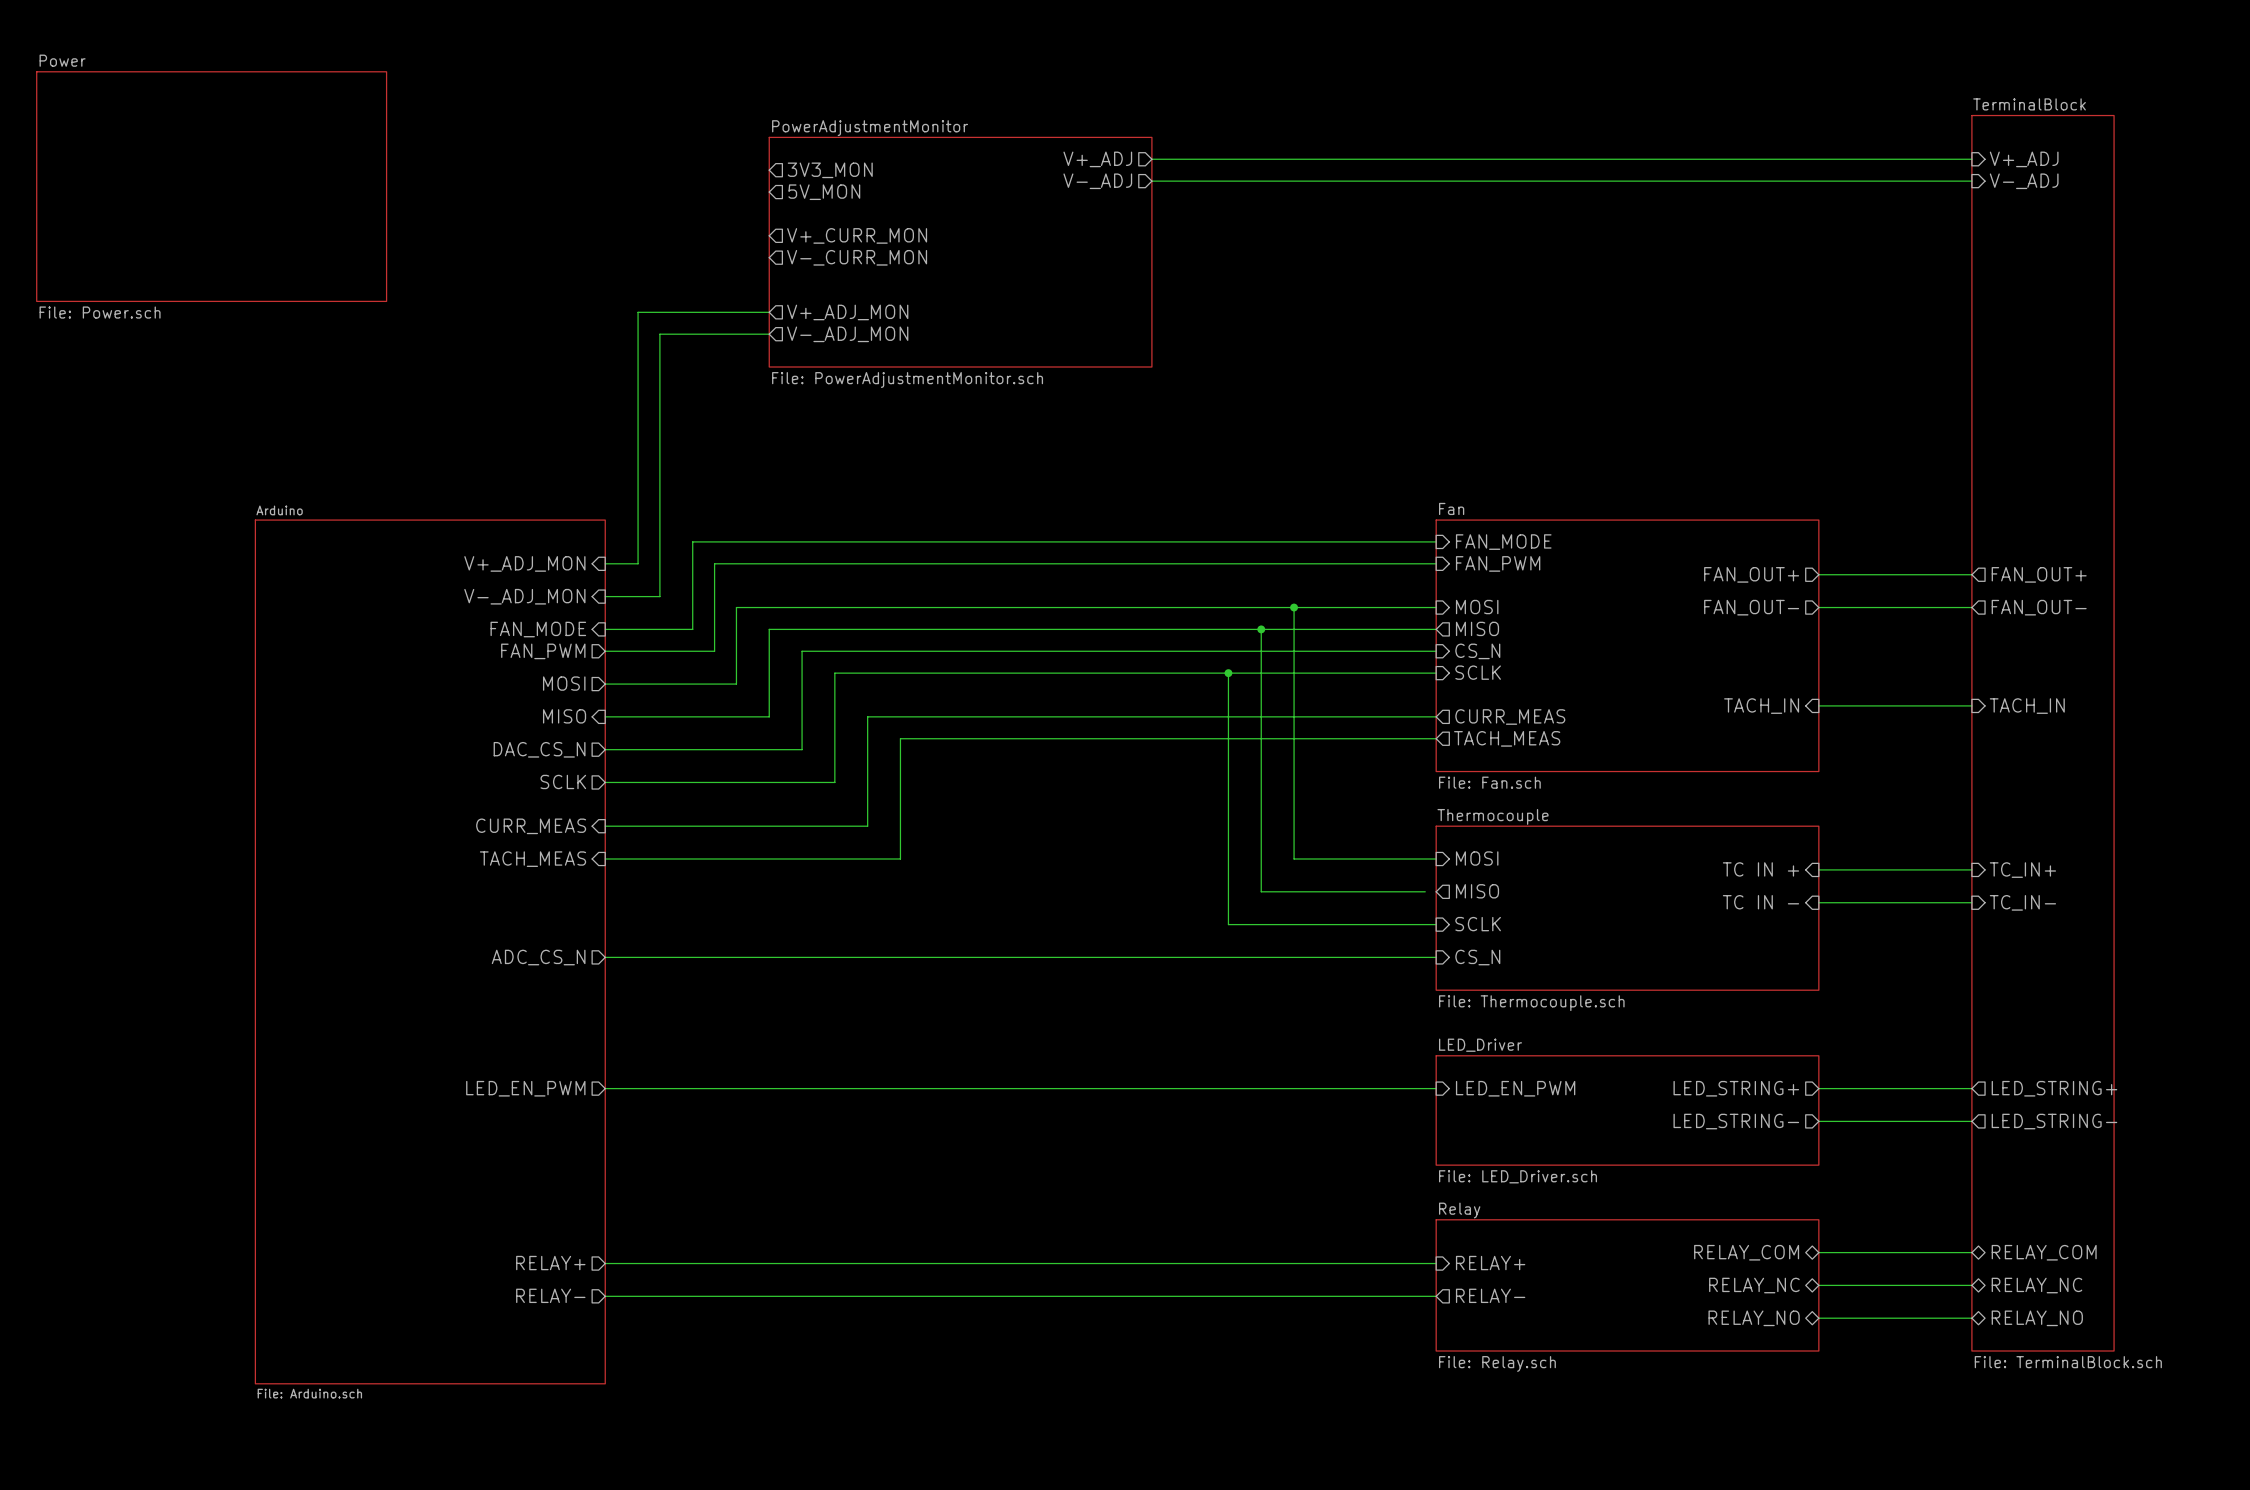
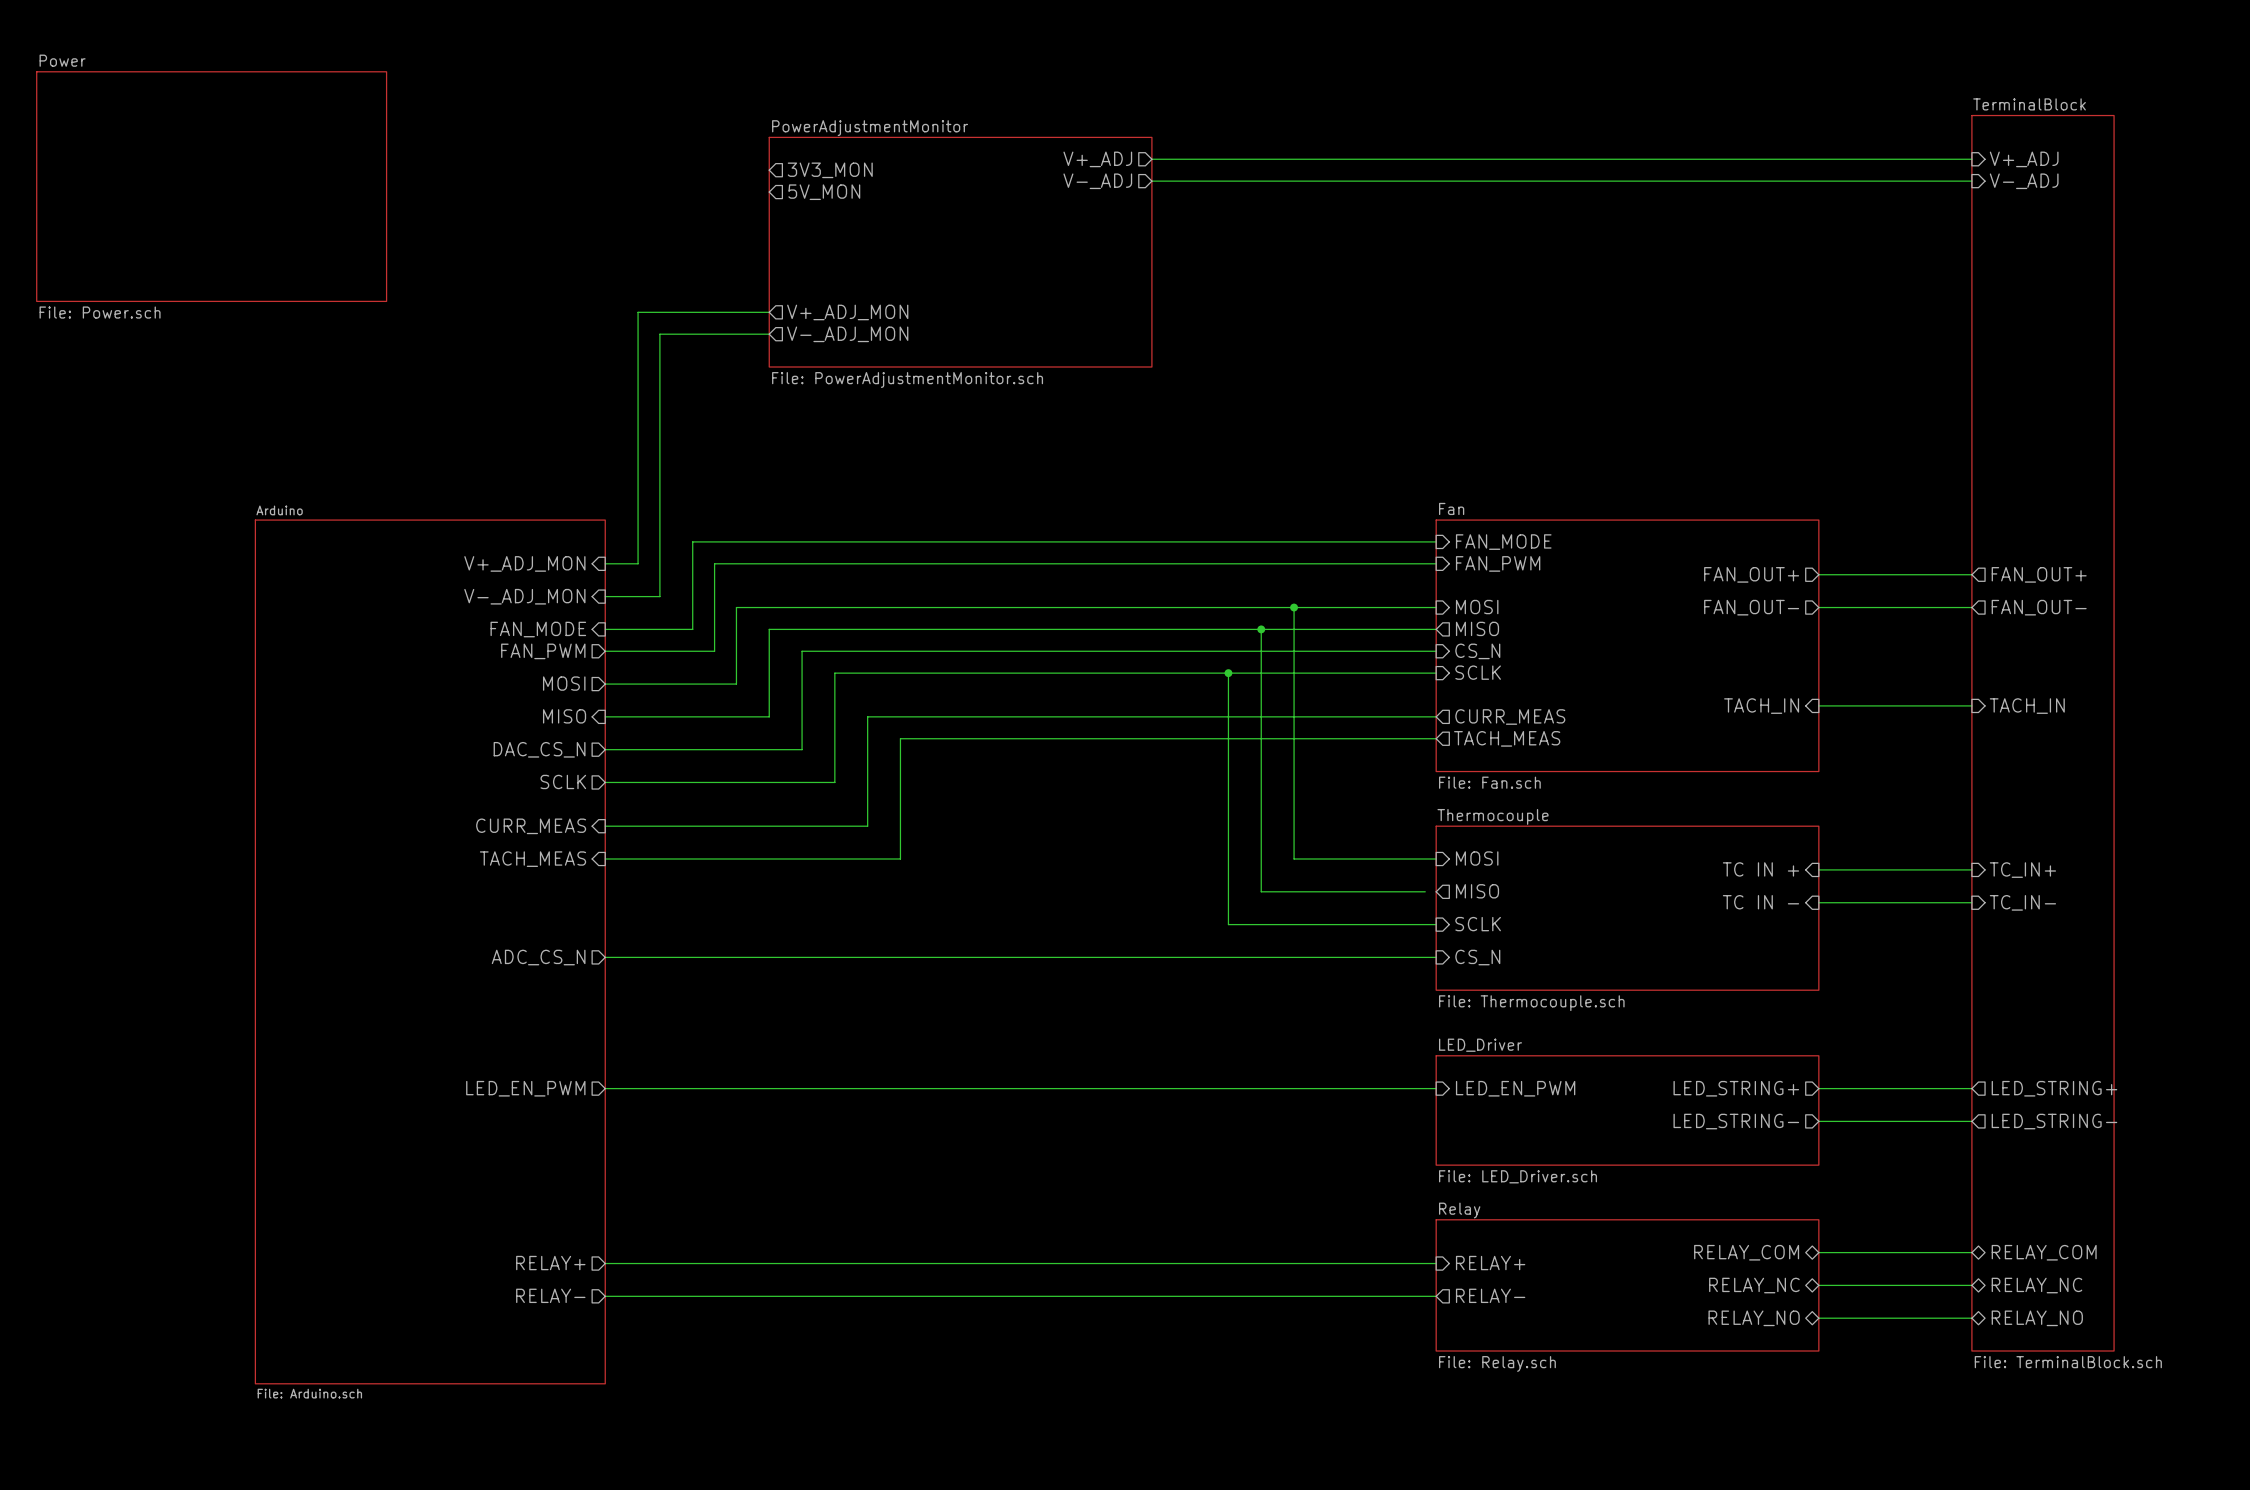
sheet pin: V+_CURR_MON (857, 235) -> none
sheet pin: V-_CURR_MON (857, 257) -> none

